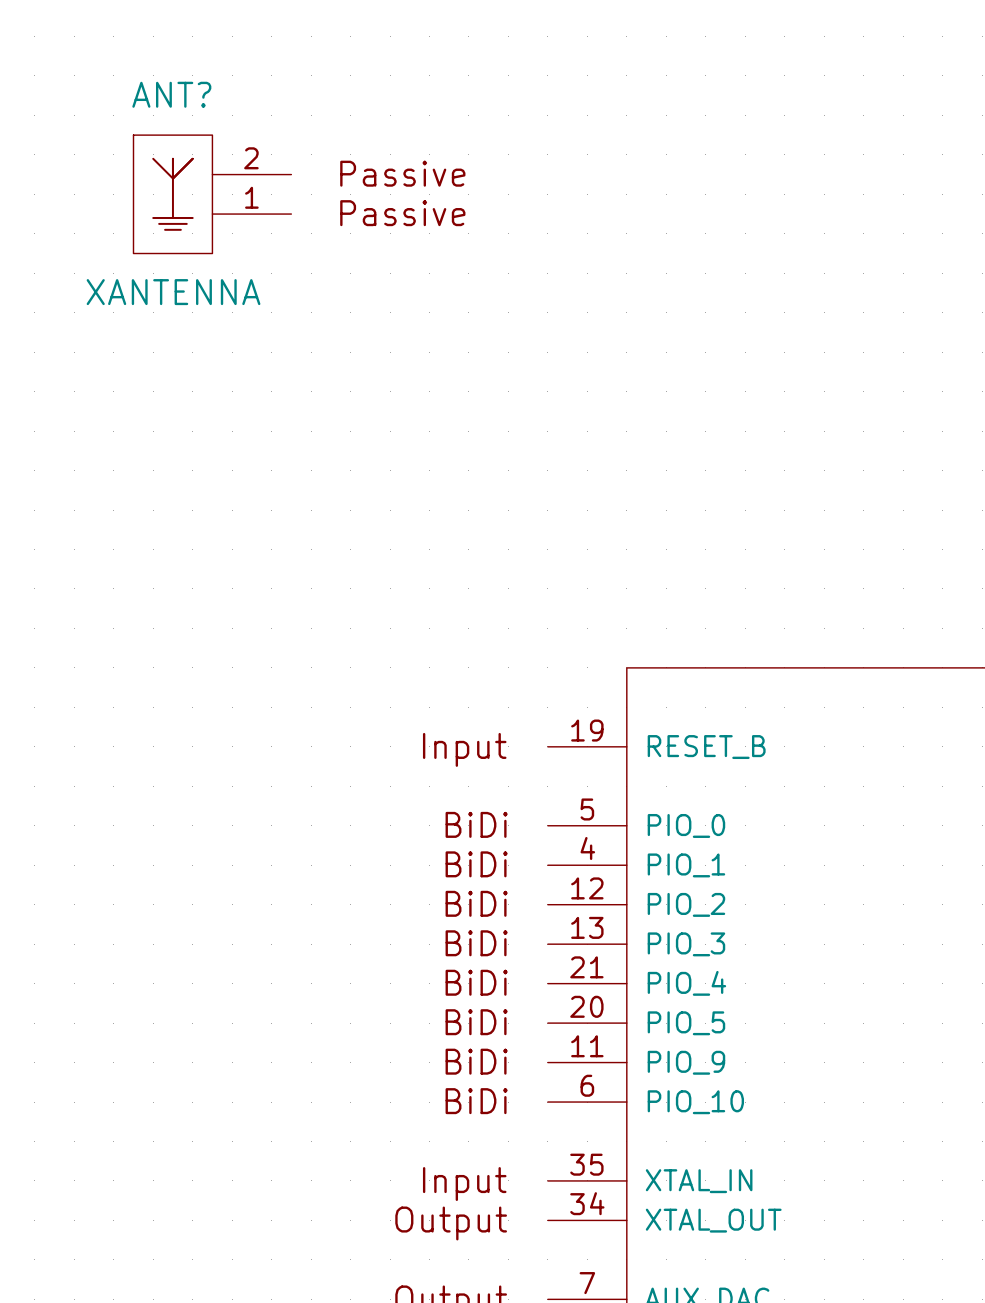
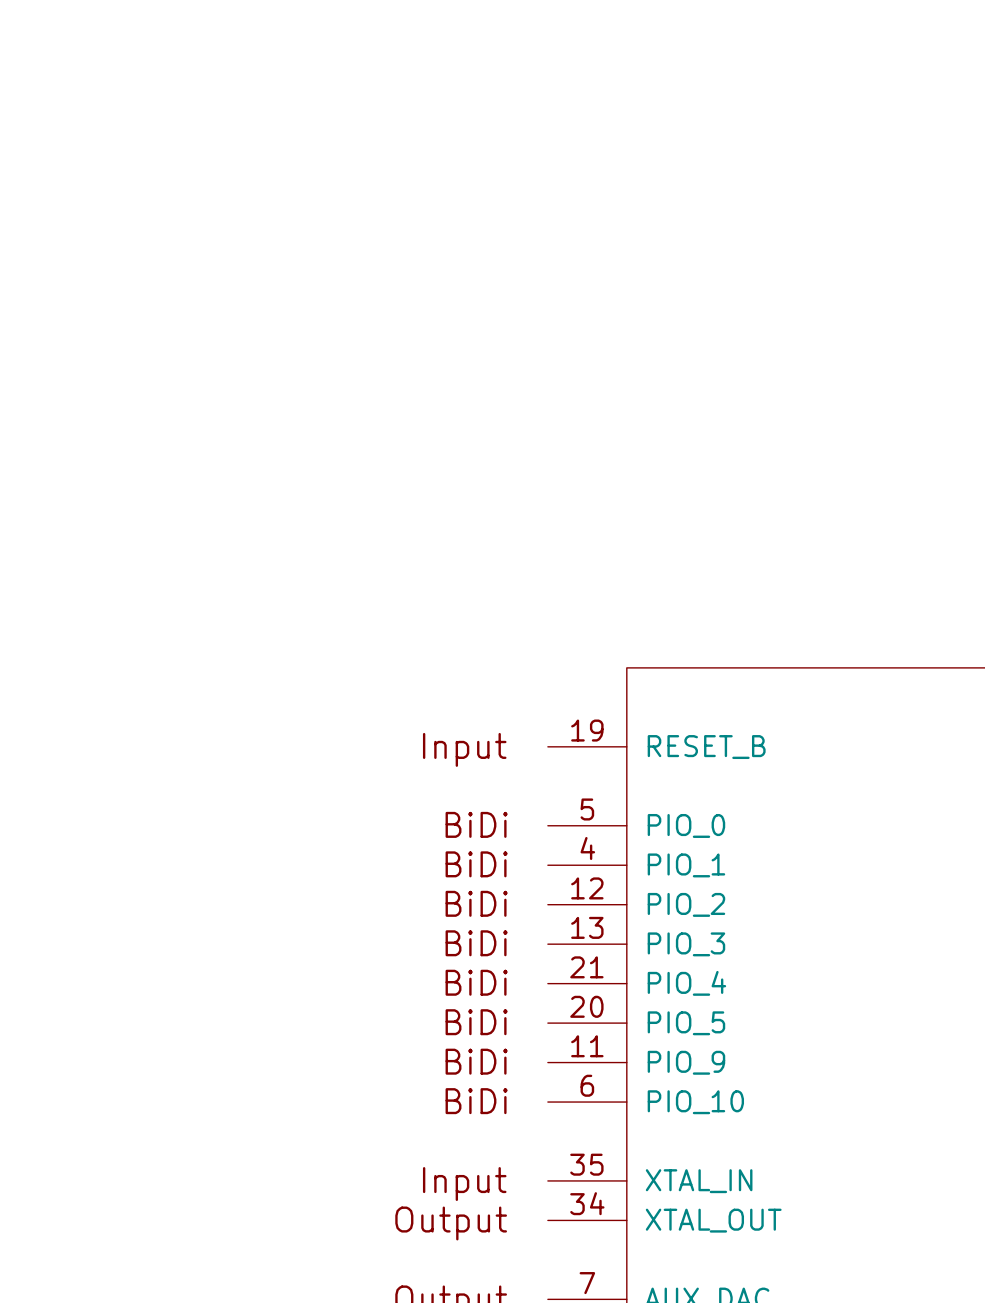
ANT?: XANTENNA (212, 194) -> none

